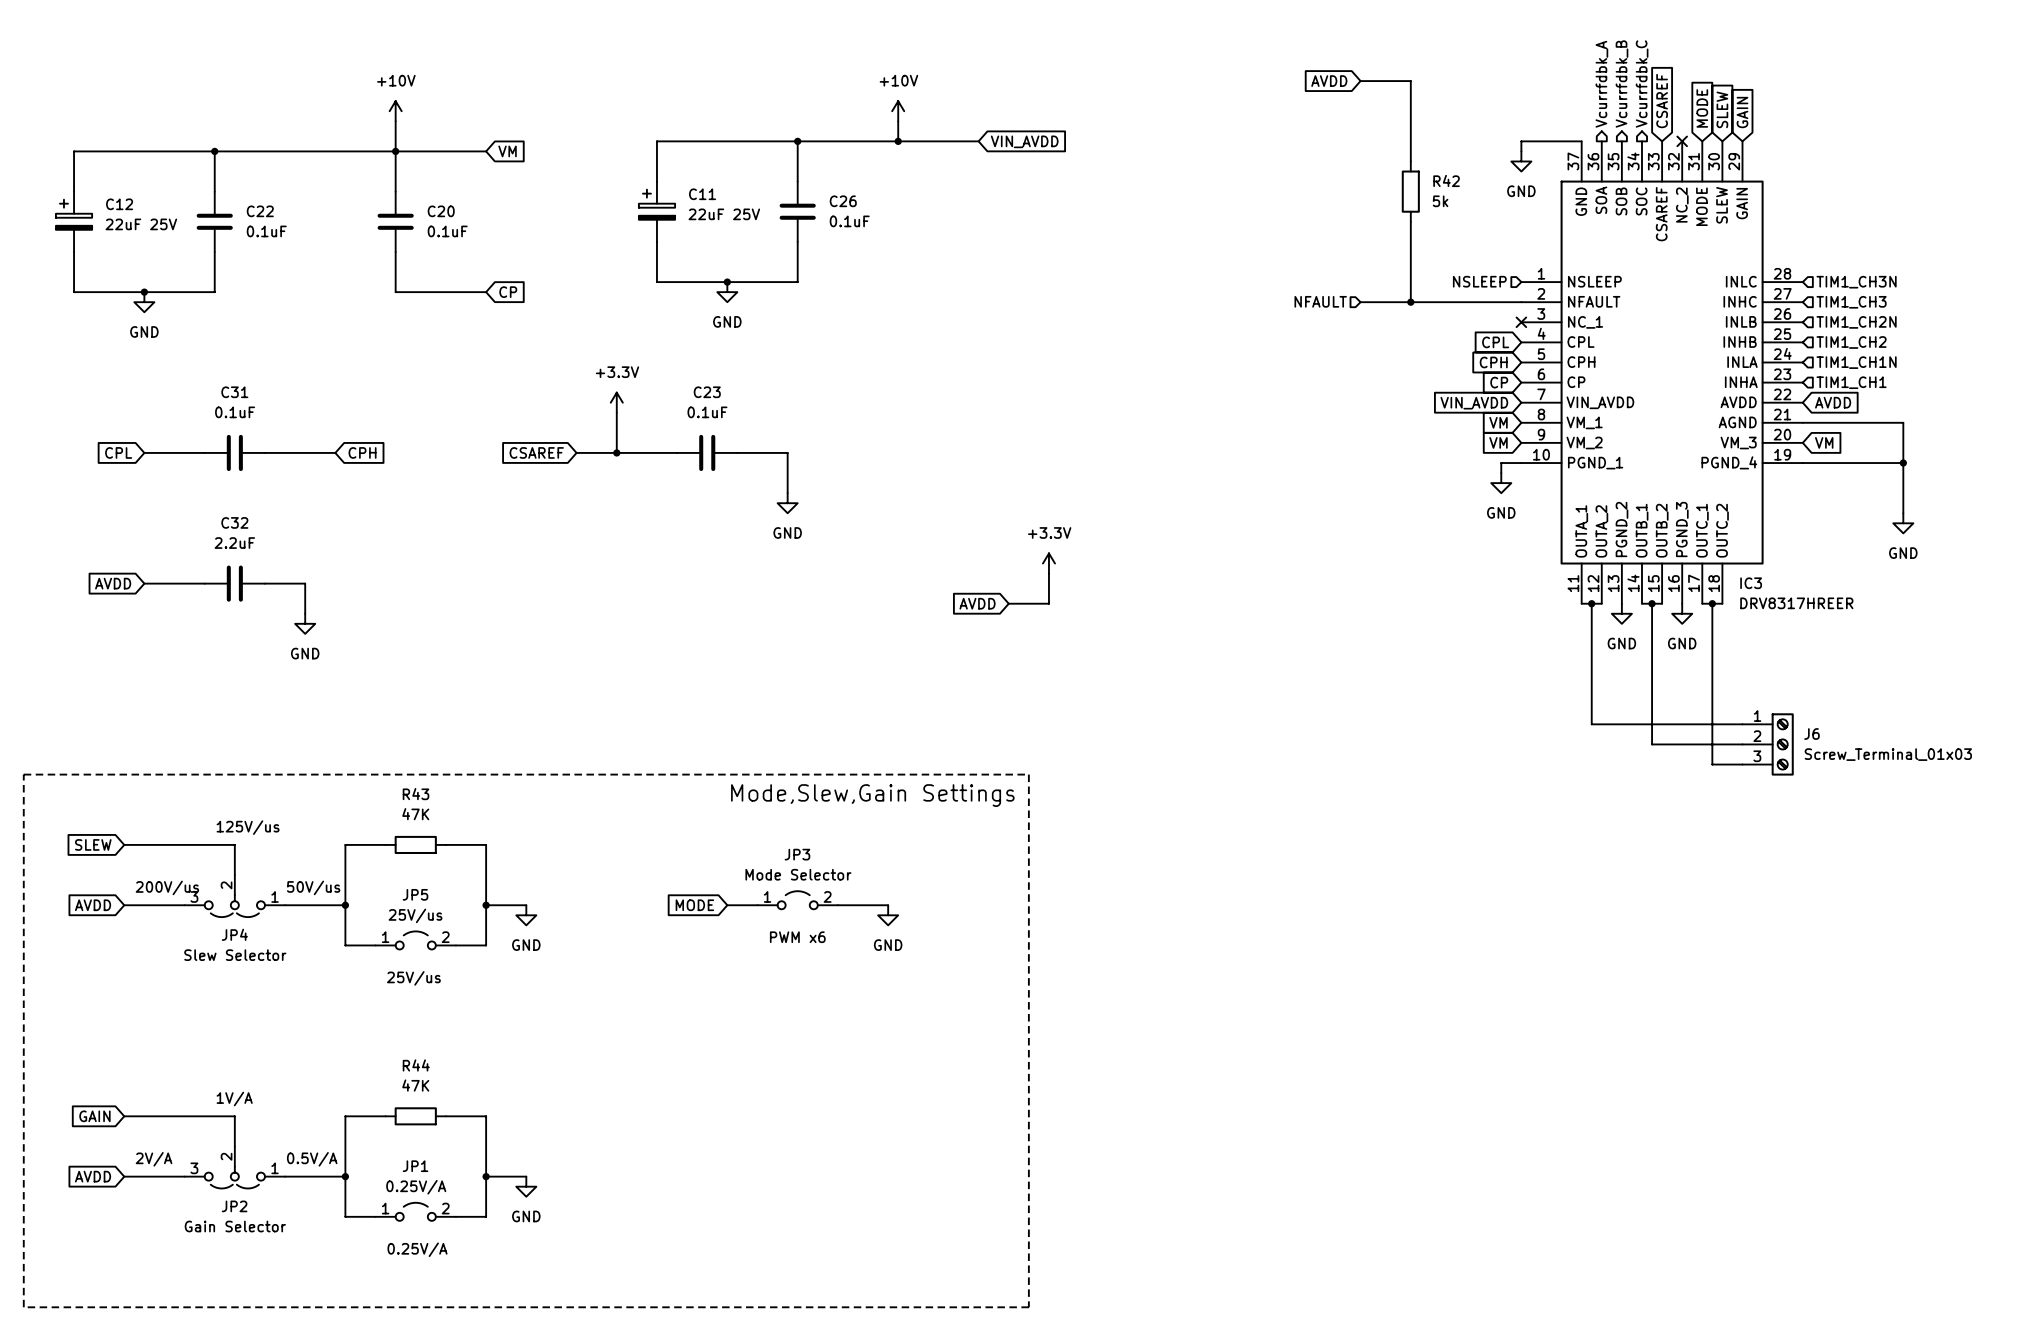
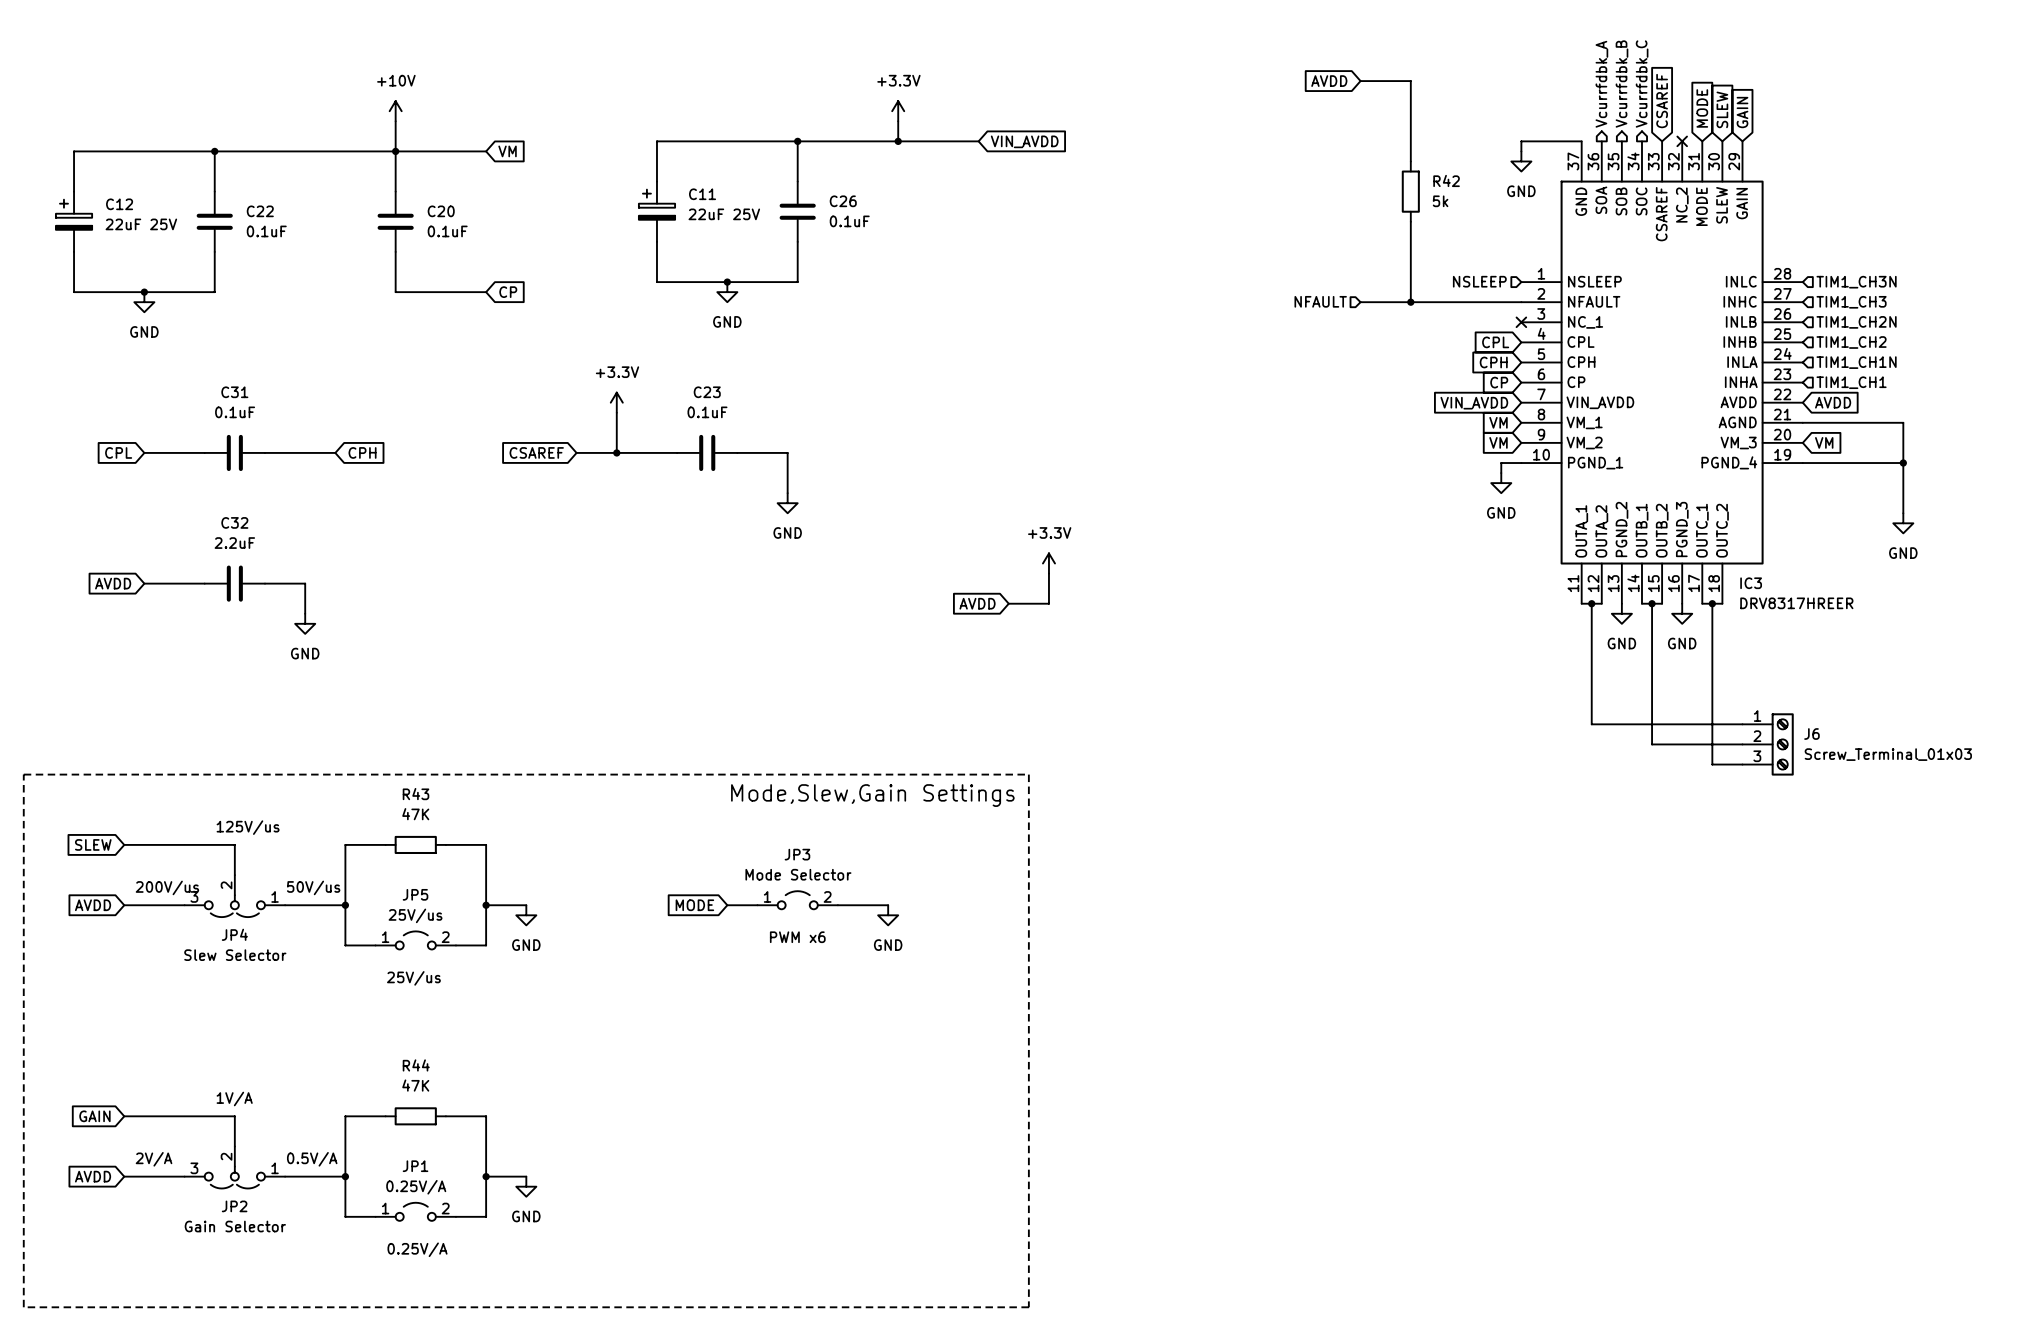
power symbol: +10V (898, 111) -> +3.3V (898, 111)

